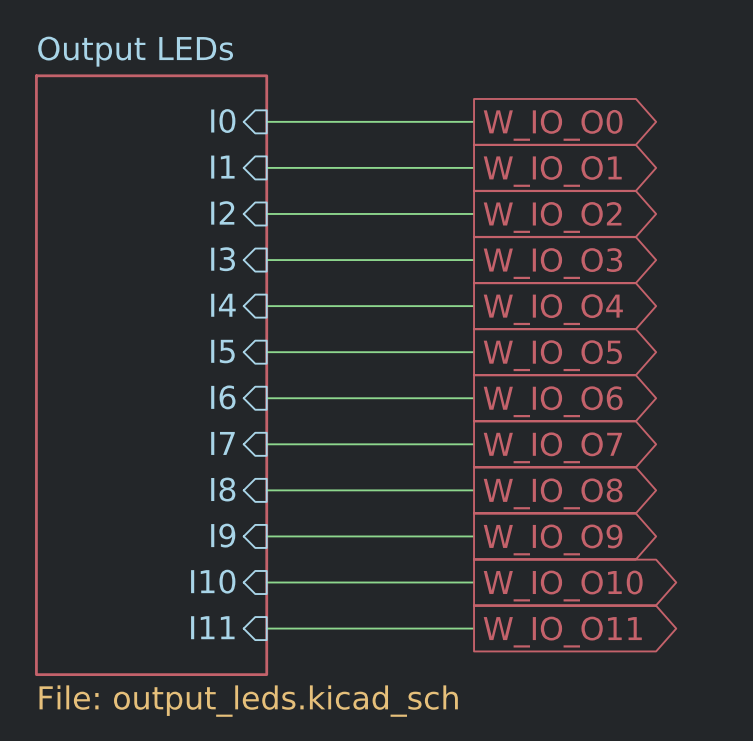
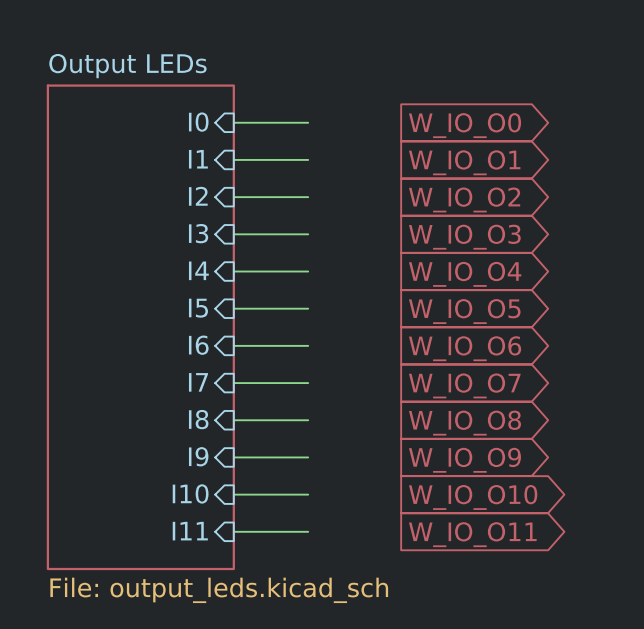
wire: (358, 121) (474, 121) -> none
wire: (358, 167) (474, 167) -> none
wire: (358, 213) (474, 213) -> none
wire: (358, 260) (474, 260) -> none
wire: (358, 306) (474, 306) -> none
wire: (358, 352) (474, 352) -> none
wire: (358, 398) (474, 398) -> none
wire: (358, 444) (474, 444) -> none
wire: (358, 490) (474, 490) -> none
wire: (358, 536) (474, 536) -> none
wire: (358, 582) (474, 582) -> none
wire: (358, 628) (474, 628) -> none

